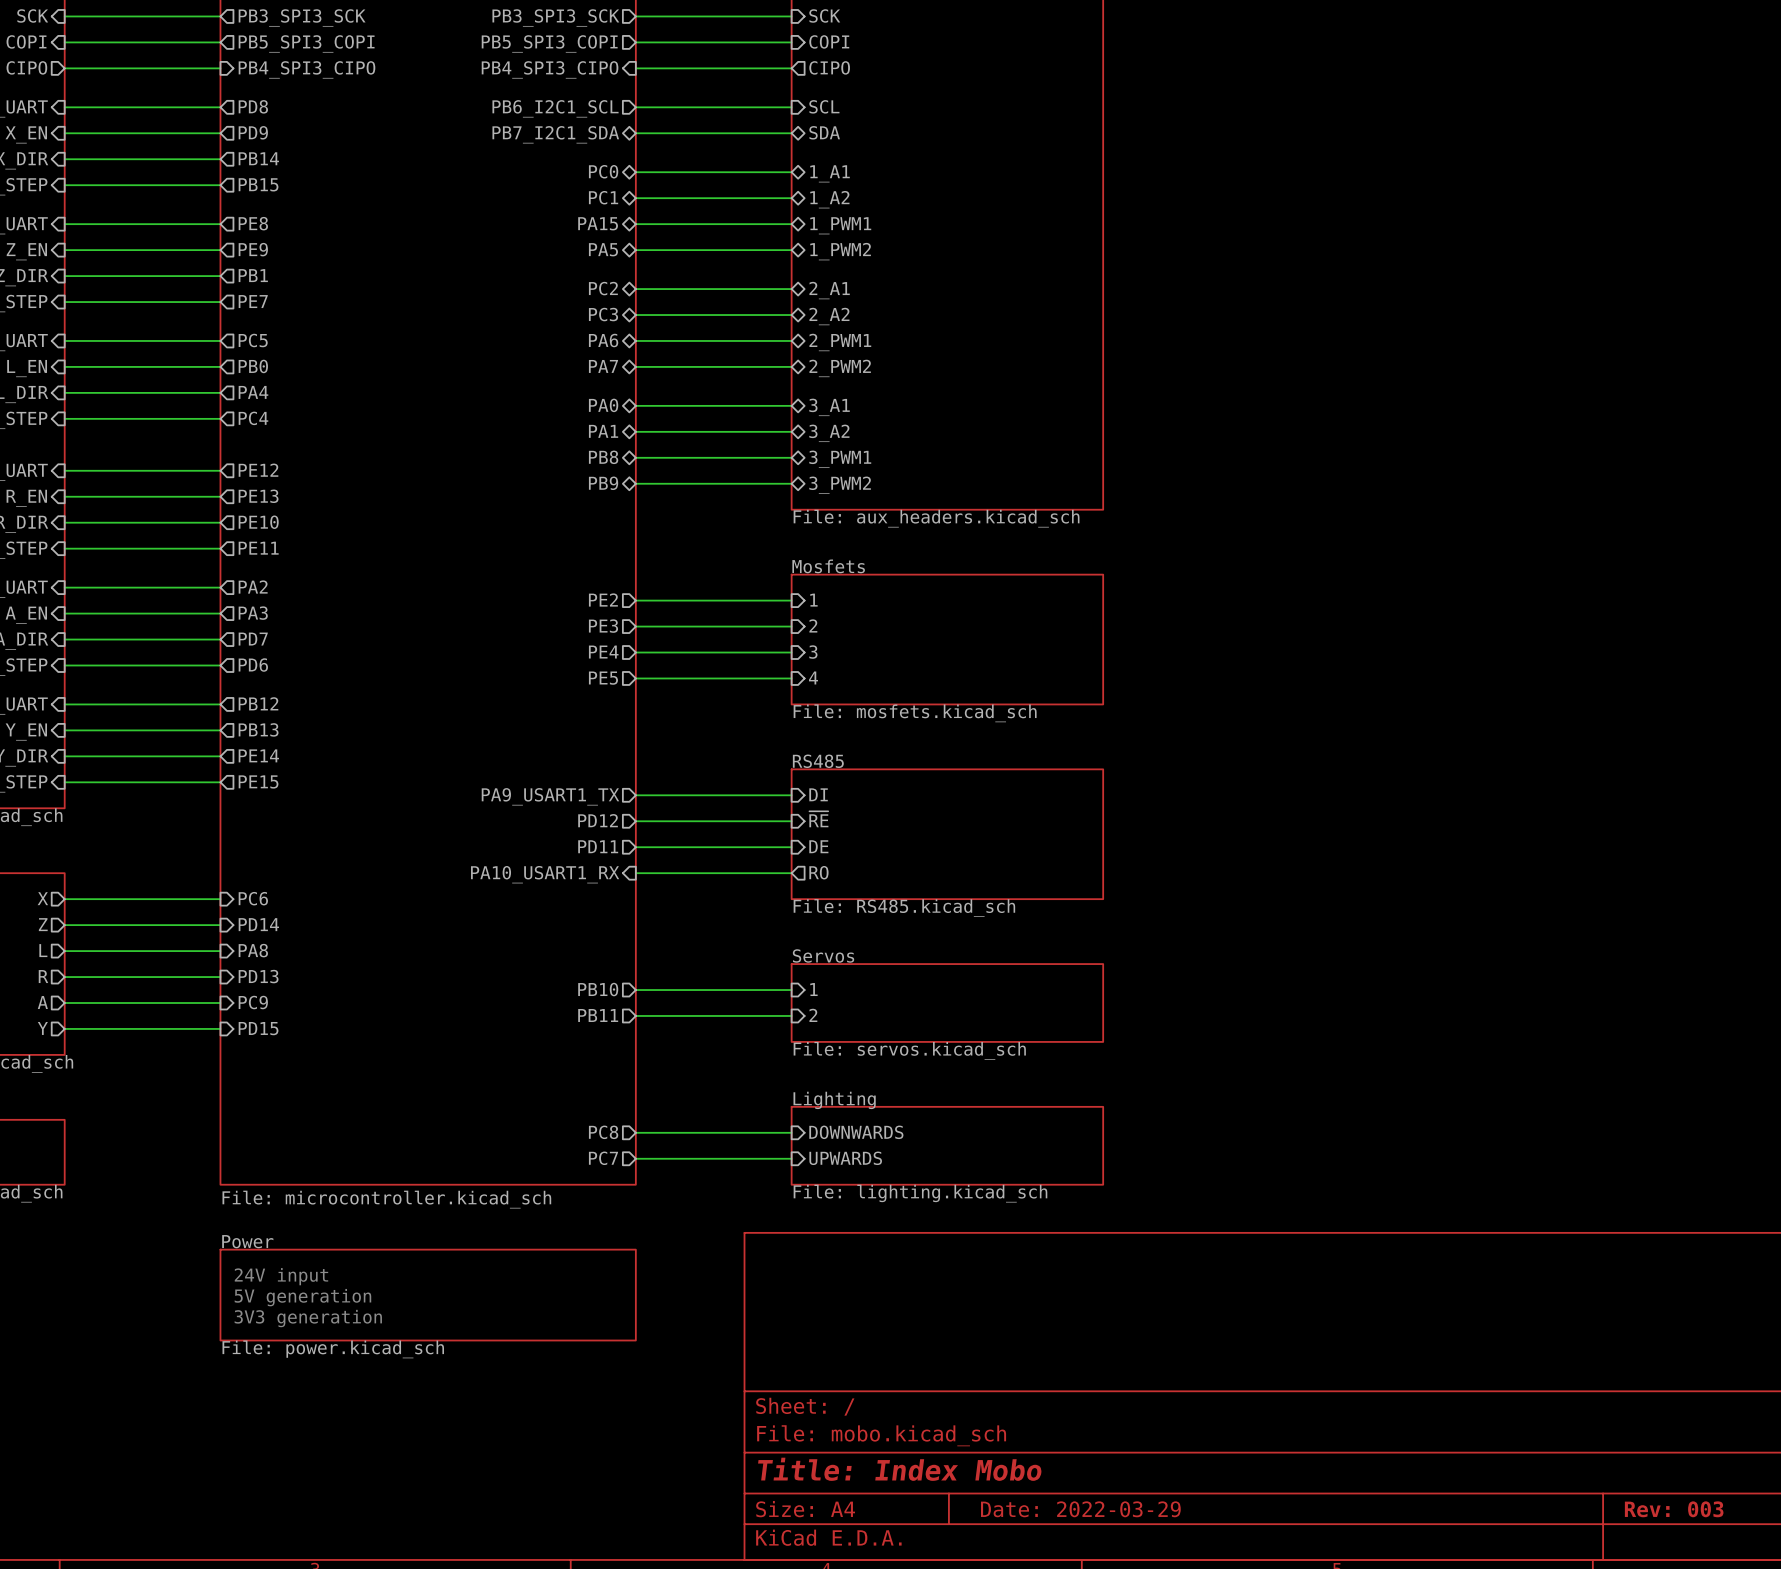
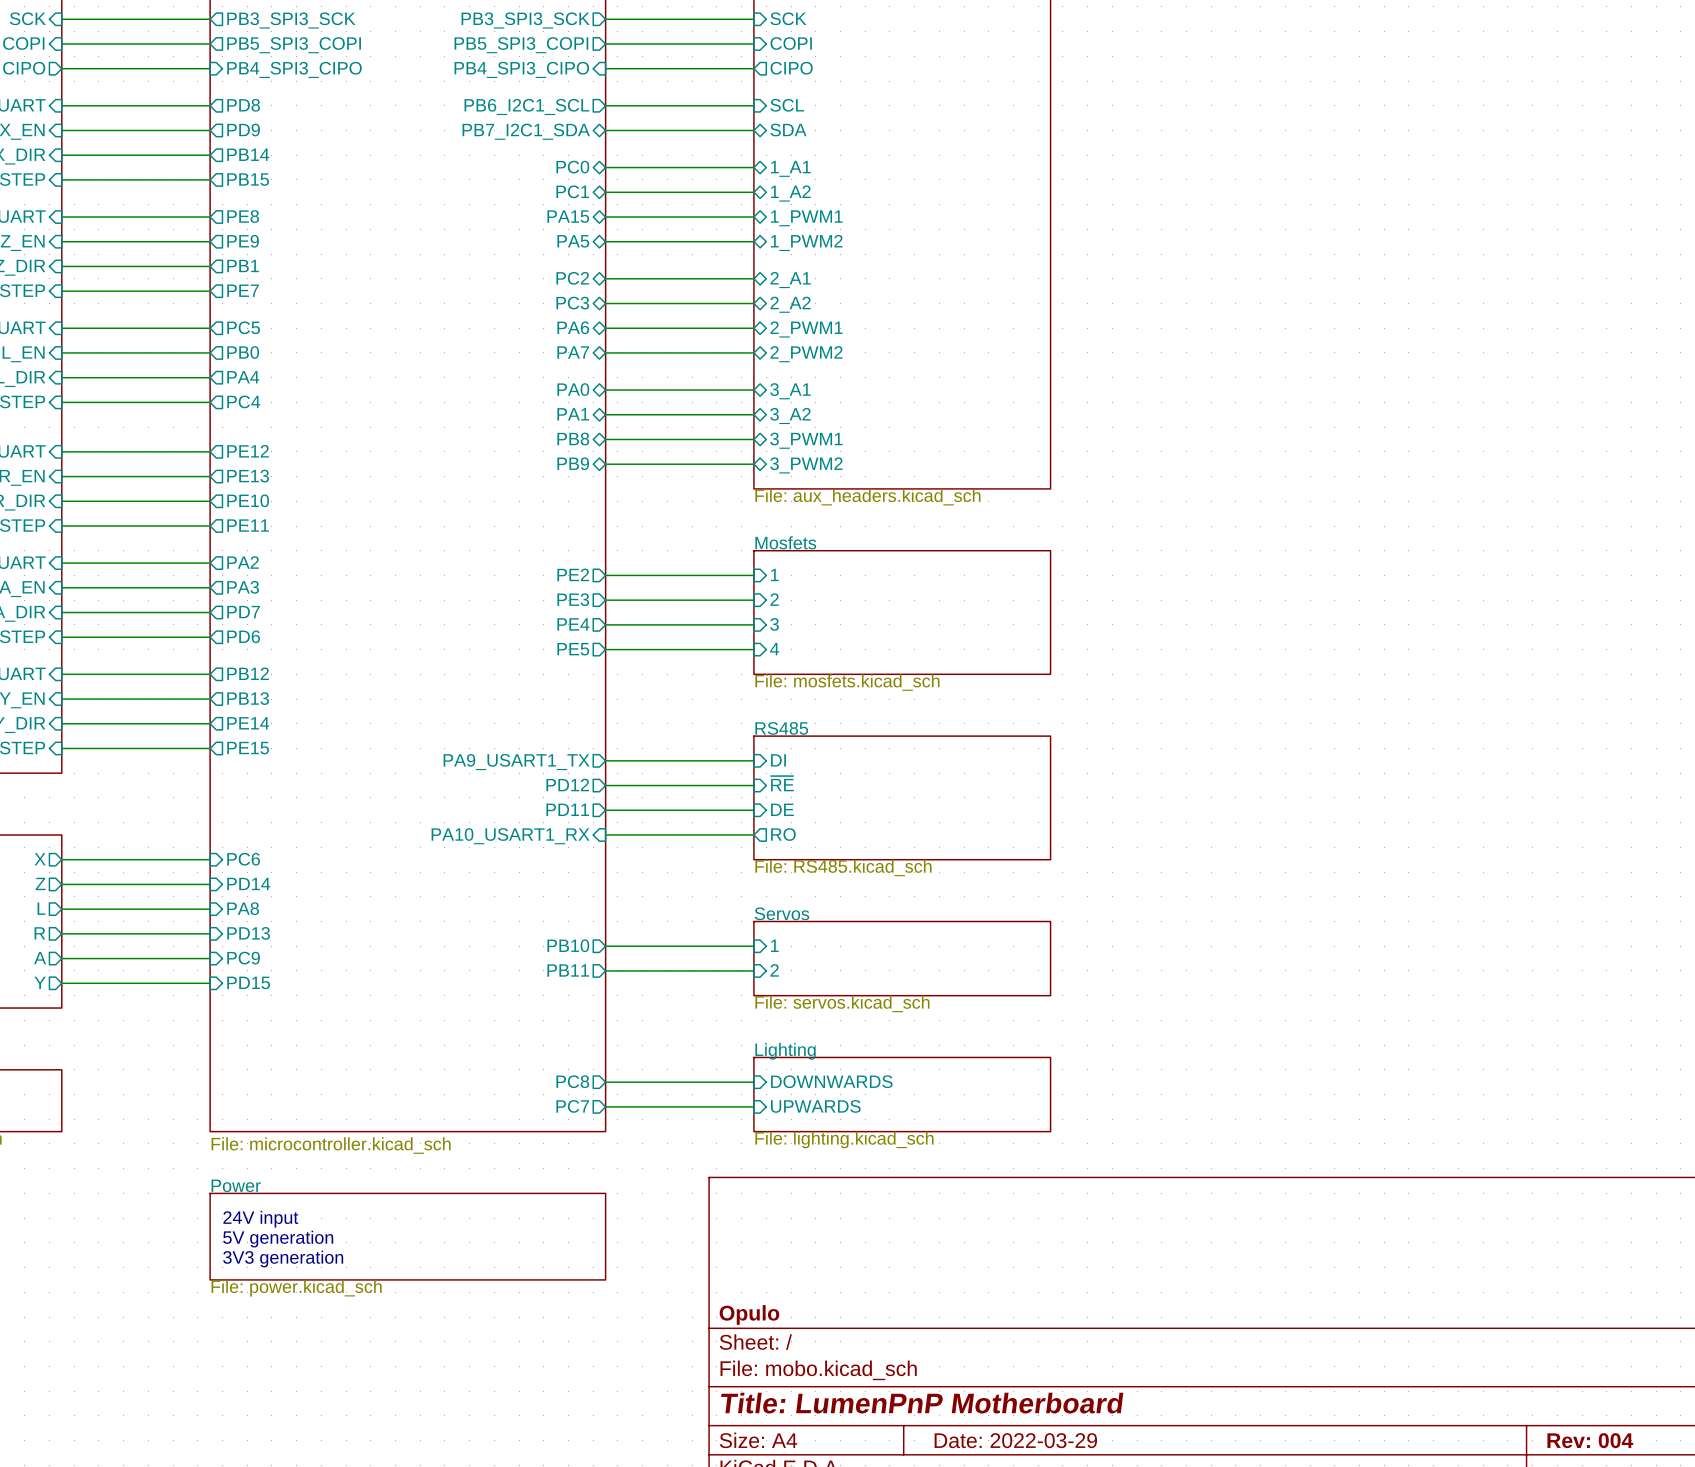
title block: none -> Opulo (749, 1314)
title block: Title: Index Mobo (899, 1469) -> Title: LumenPnP Motherboard (922, 1403)
title block: Rev: 003 (1674, 1509) -> Rev: 004 (1590, 1440)

